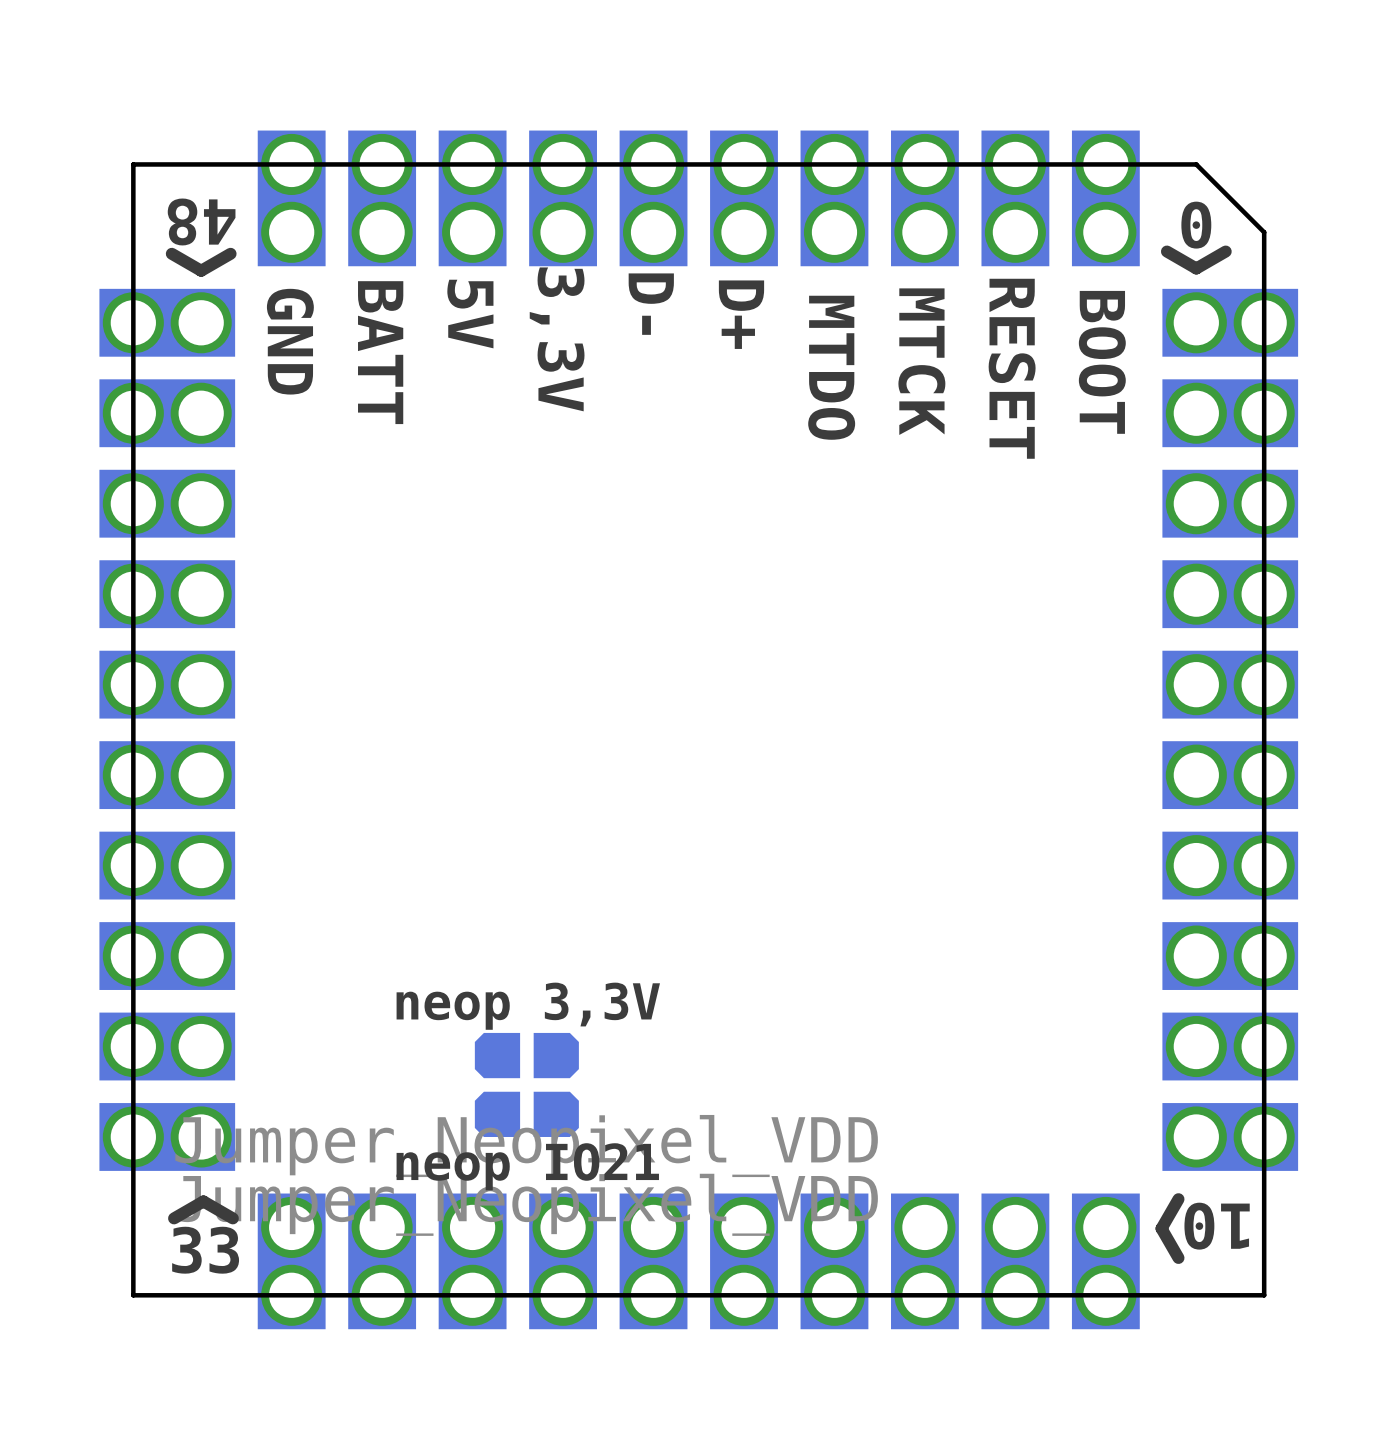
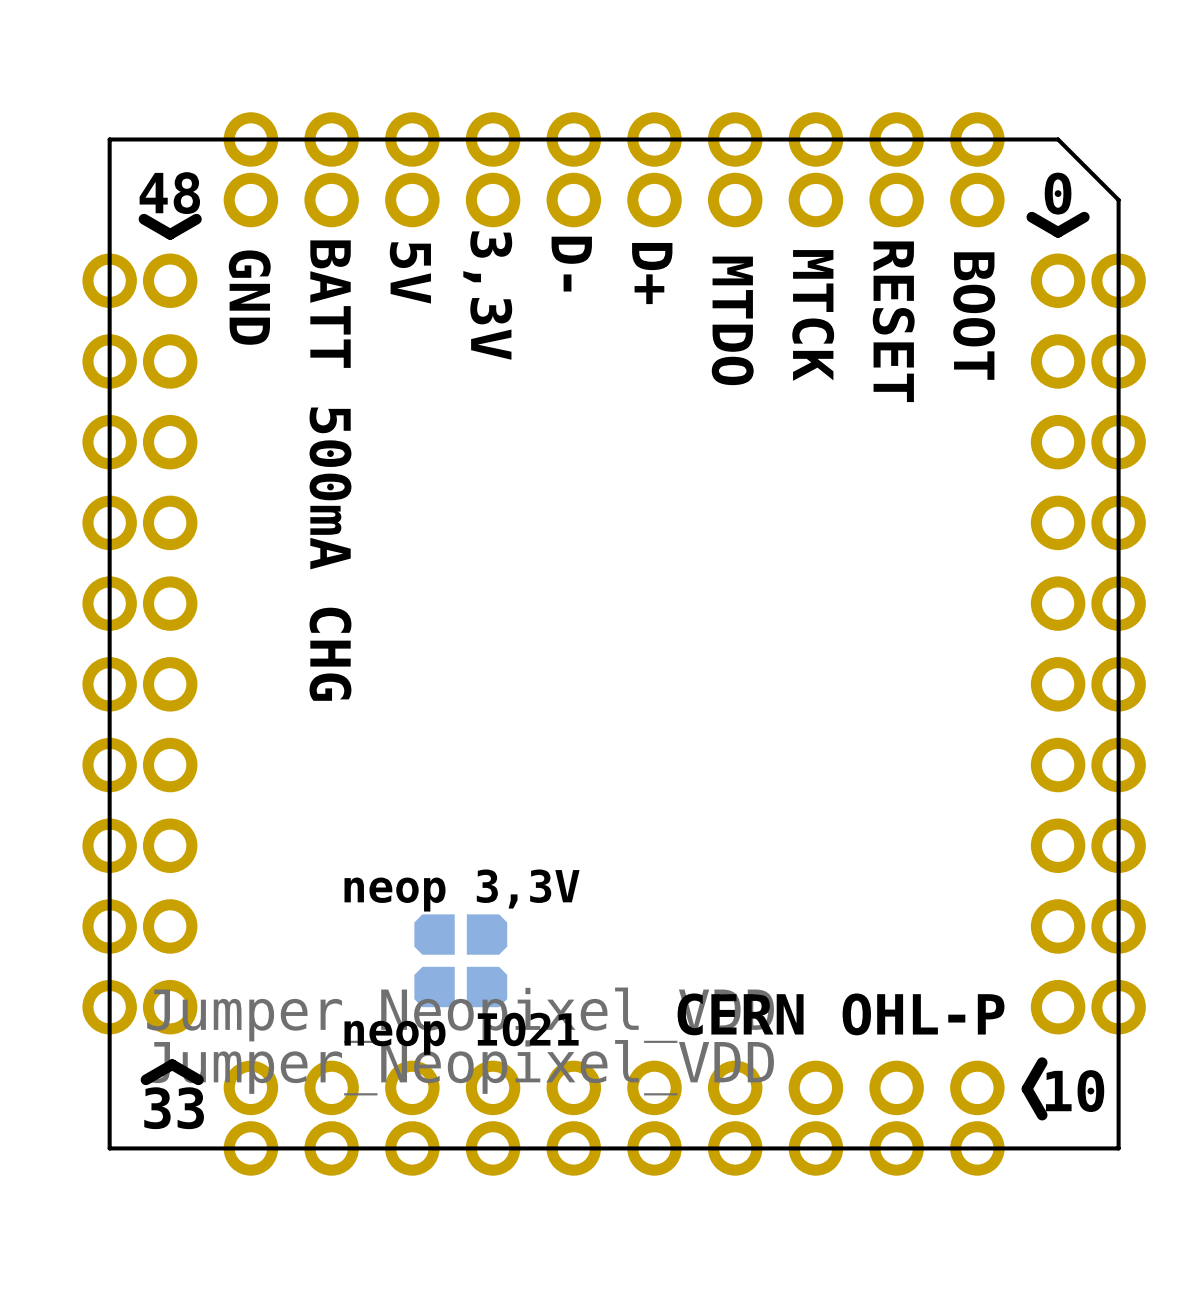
part footprint: [257, 130, 1140, 267] -> [223, 112, 1005, 228]
text rotation: 0° (201, 221) -> 180° (169, 193)
part footprint: [99, 288, 236, 1171] -> [82, 253, 198, 1035]
part footprint: [1162, 288, 1299, 1171] -> [1030, 253, 1146, 1035]
text: BATT (380, 352) -> none
text: none -> BATT 500mA CHG (330, 470)
text: none -> CERN OHL-P (841, 1014)
part footprint: [257, 1193, 1140, 1330] -> [223, 1060, 1005, 1176]
text rotation: 0° (1217, 1226) -> 180° (1075, 1091)

